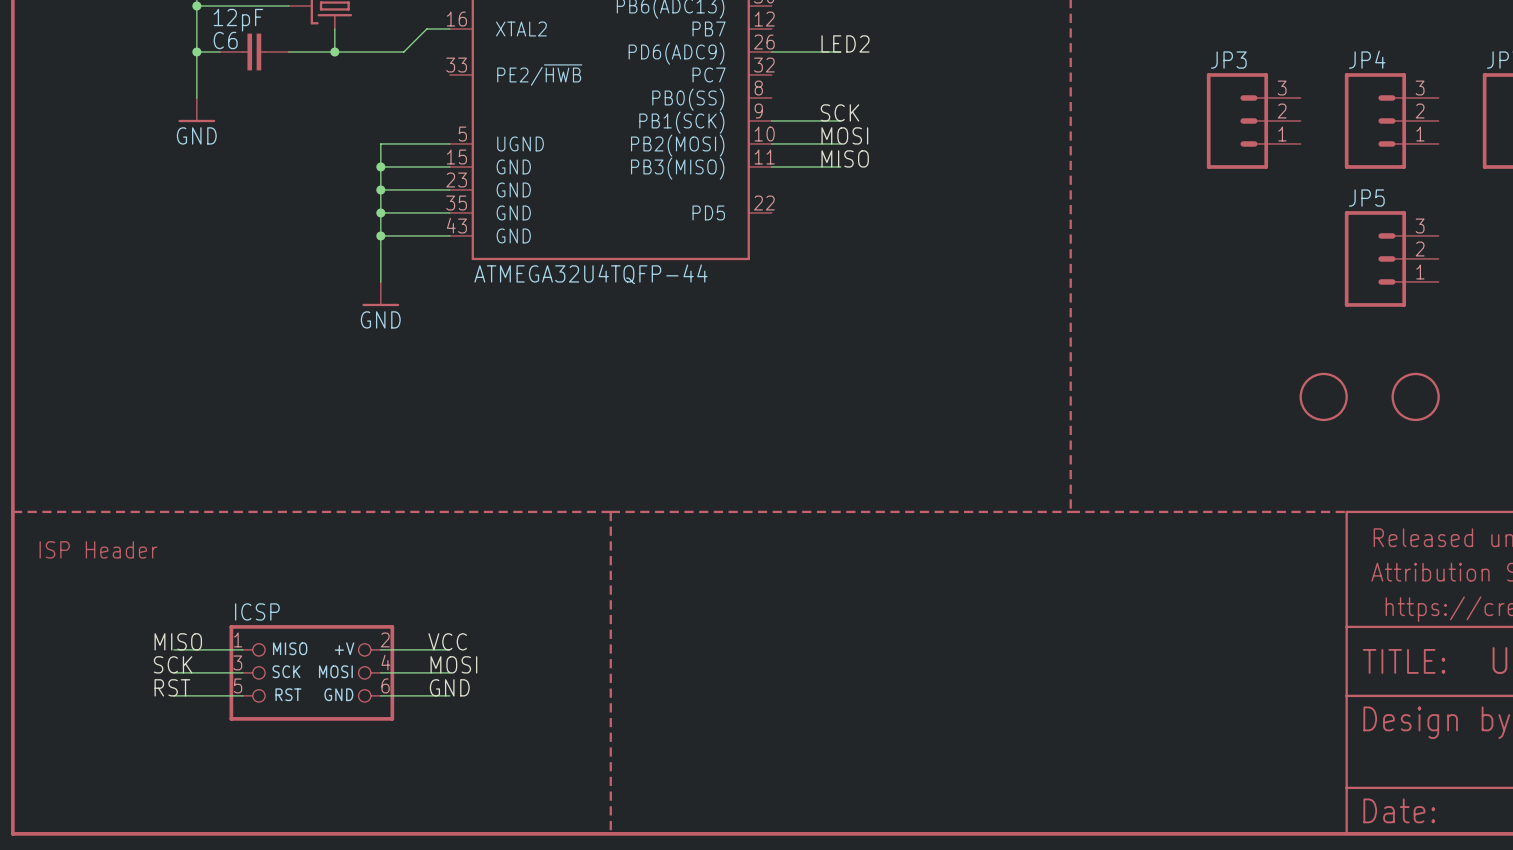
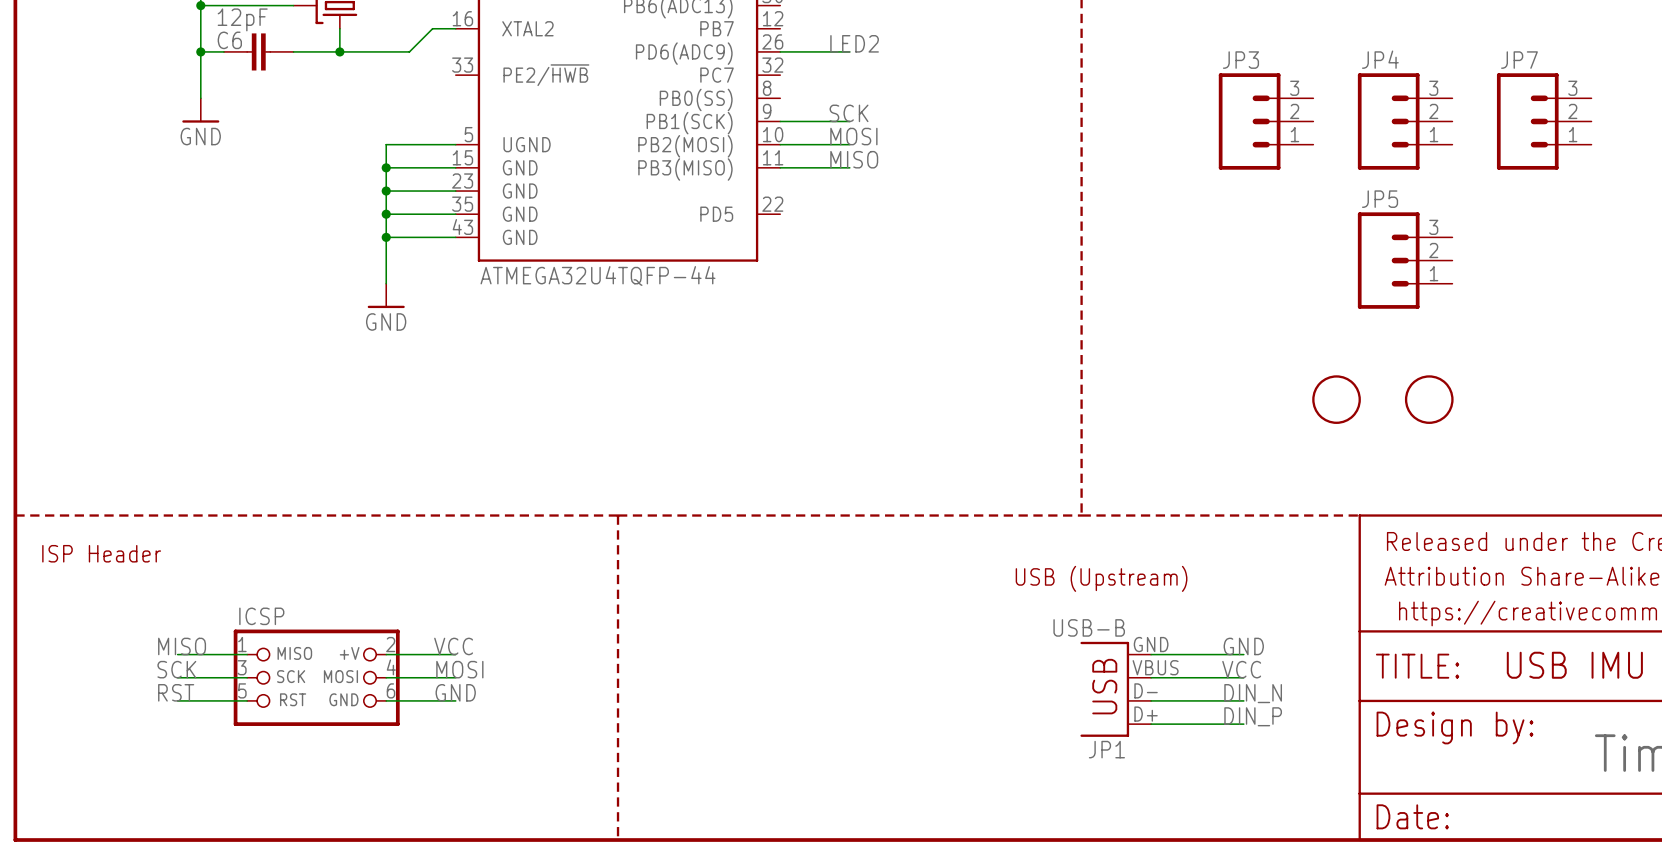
text: none -> USB (Upstream) (1101, 578)
label: none -> GND (1243, 646)
wire: none -> (1151, 654) (1243, 654)
label: none -> VCC (1241, 669)
wire: none -> (1151, 677) (1243, 677)
JP1: none -> USB-B (1115, 689)
label: none -> DIN_N (1253, 693)
wire: none -> (1151, 700) (1243, 700)
label: none -> DIN_P (1253, 716)
wire: none -> (1151, 724) (1243, 724)

